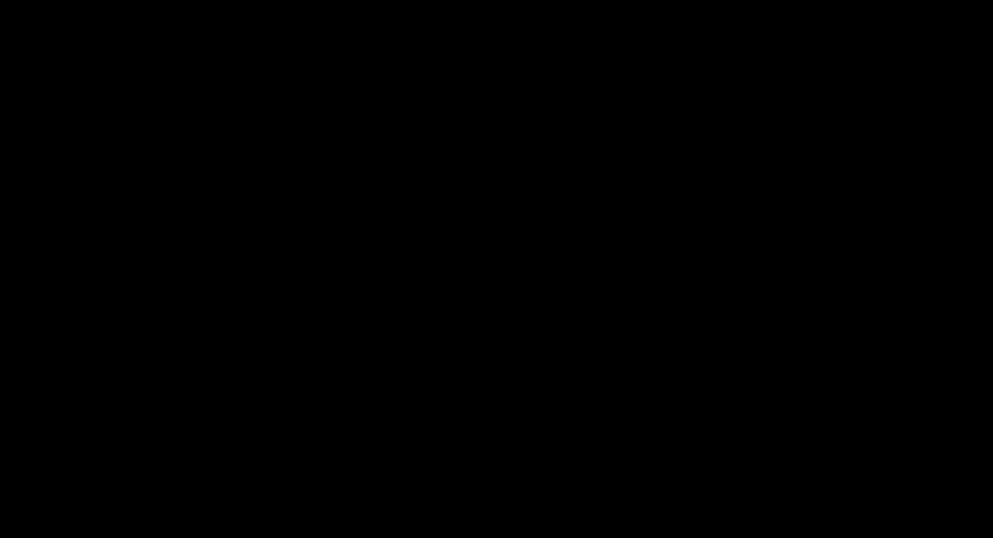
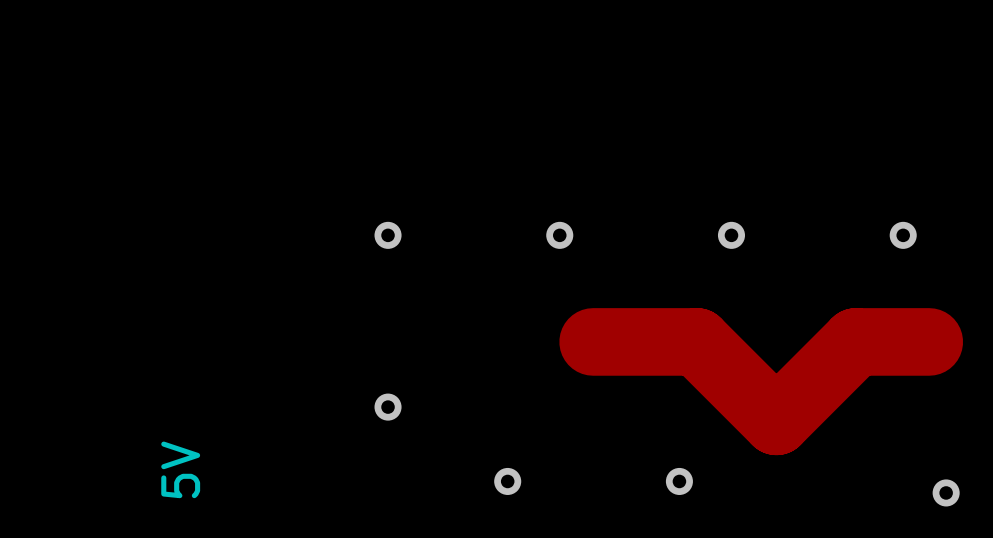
via: none -> (388, 235)
via: none -> (559, 235)
via: none -> (731, 235)
via: none -> (903, 235)
track: none -> (593, 341) (697, 341) (776, 421) (855, 341) (929, 341)
via: none -> (388, 407)
text: none -> 5V (180, 469)
via: none -> (507, 481)
via: none -> (679, 481)
via: none -> (946, 492)

